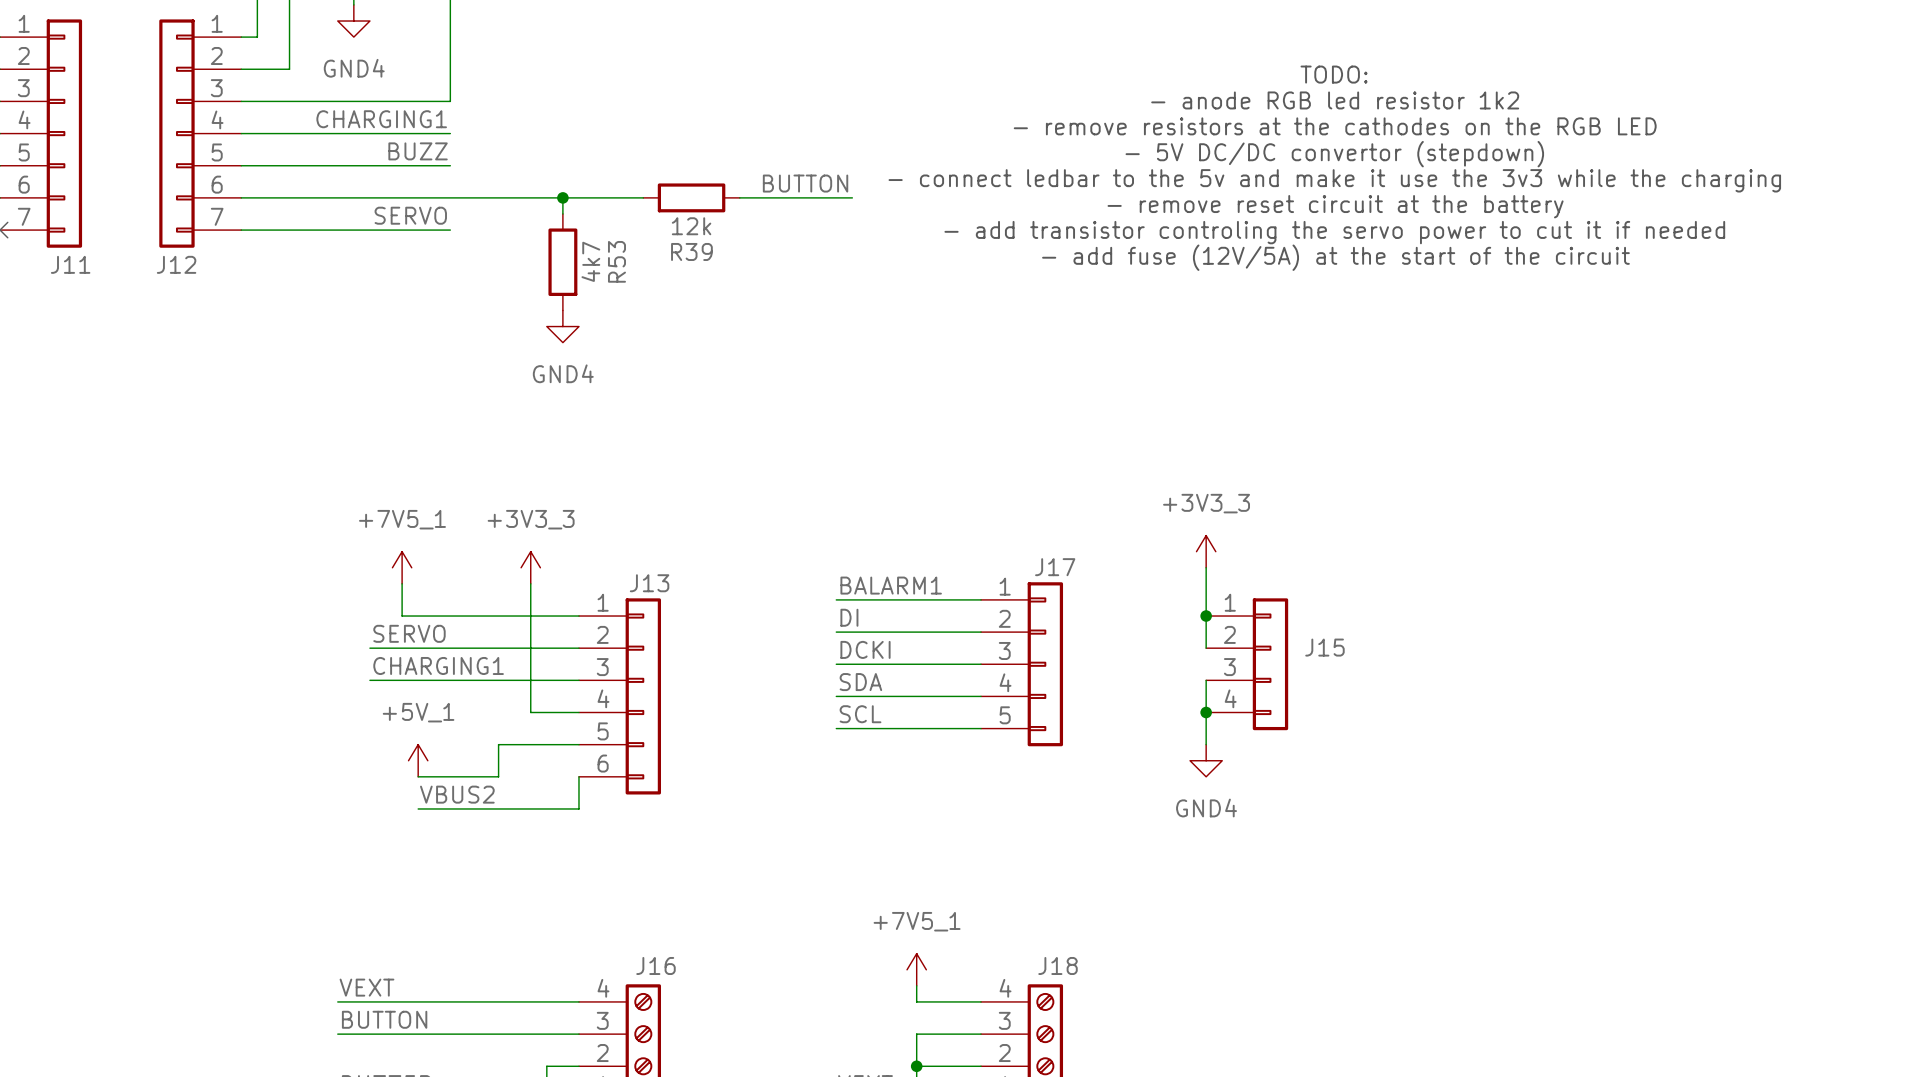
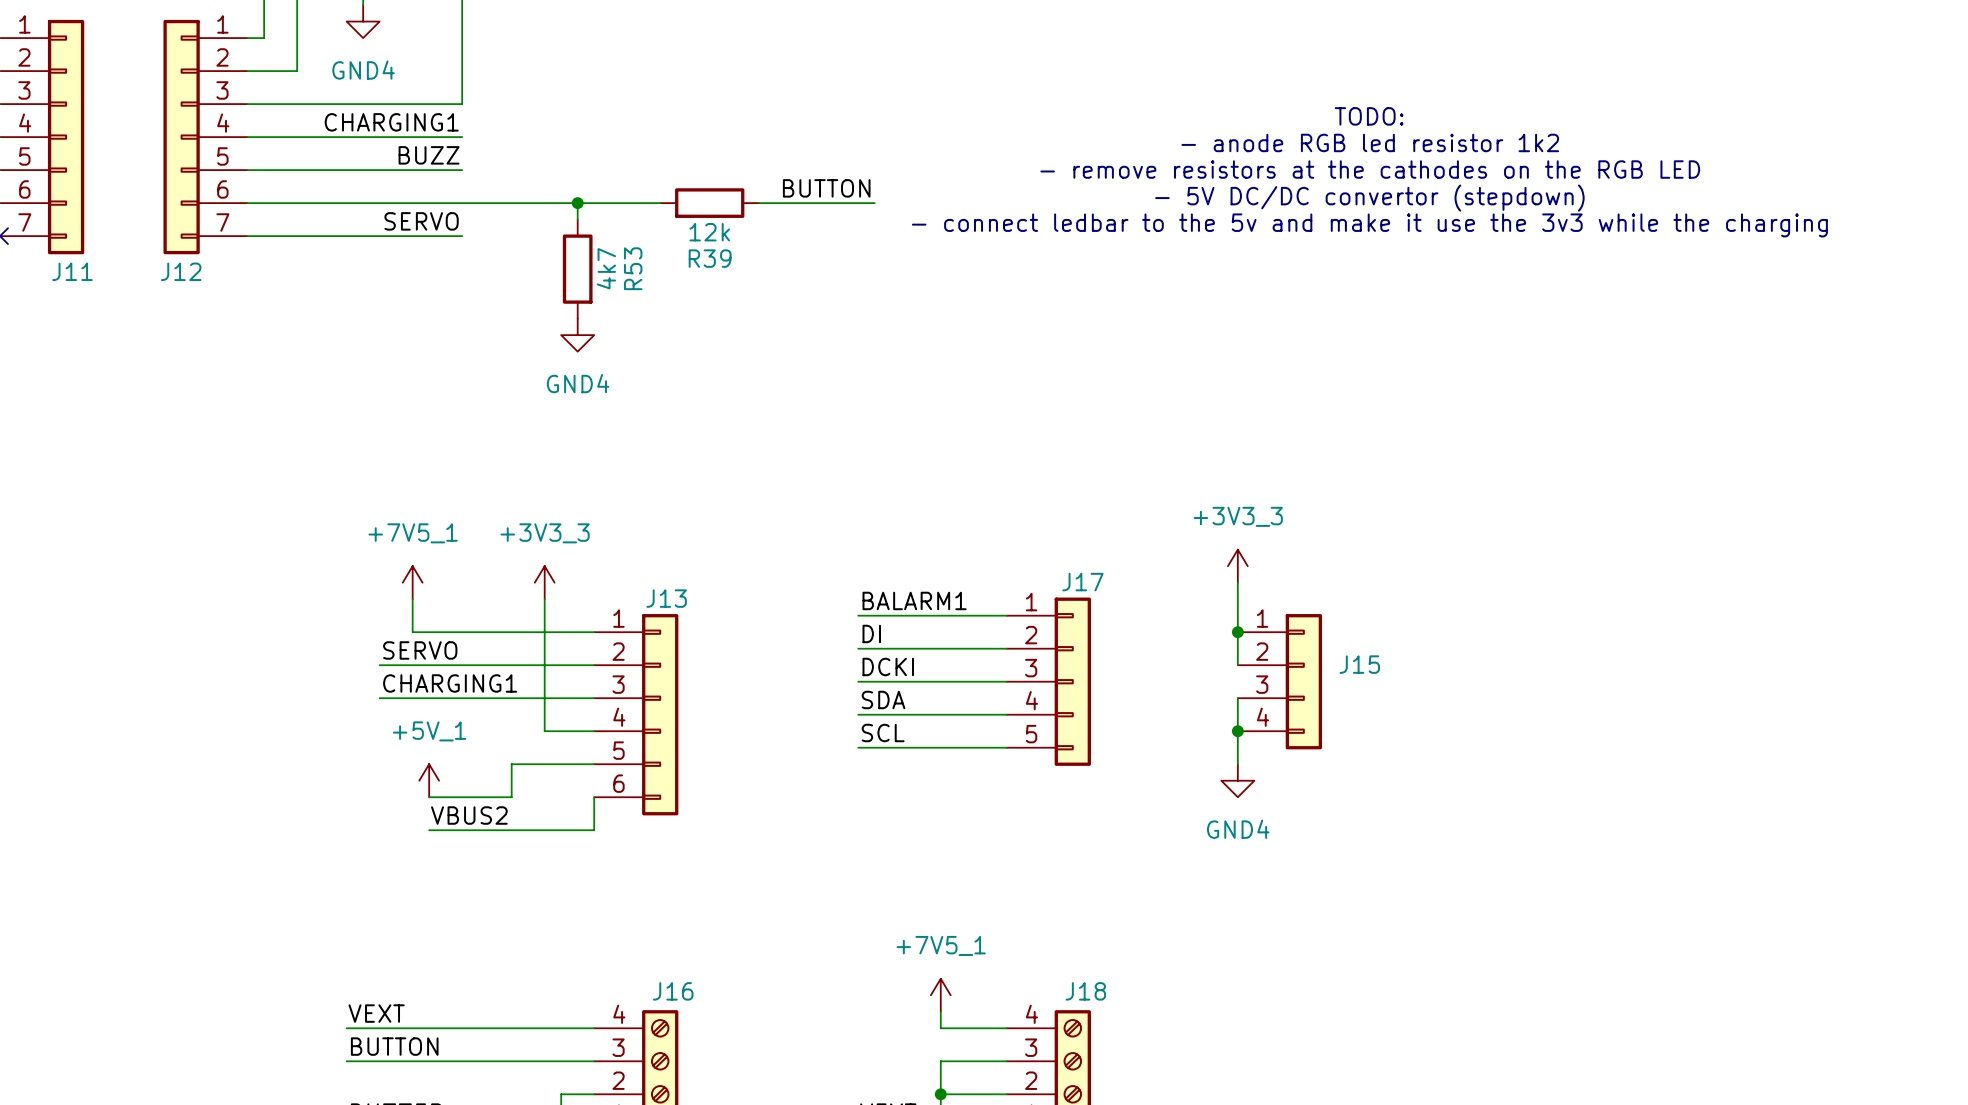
text position: TODO: (1334, 74) -> TODO: (1369, 116)
text position: - anode RGB led resistor 1k2 (1335, 100) -> - anode RGB led resistor 1k2 (1370, 142)
text position: - remove resistors at the cathodes on the RGB LED (1335, 126) -> - remove resistors at the cathodes on the RGB LED (1370, 169)
text position: - 5V DC/DC convertor (stepdown) (1334, 154) -> - 5V DC/DC convertor (stepdown) (1369, 198)
text position: - connect ledbar to the 5v and make it use the 3v3 while the charging (1334, 180) -> - connect ledbar to the 5v and make it use the 3v3 while the charging (1369, 225)
text: - remove reset circuit at the battery (1335, 206) -> none
text: - add transistor controling the servo power to cut it if needed (1334, 232) -> none
text: - add fuse (12V/5A) at the start of the circuit (1335, 257) -> none

